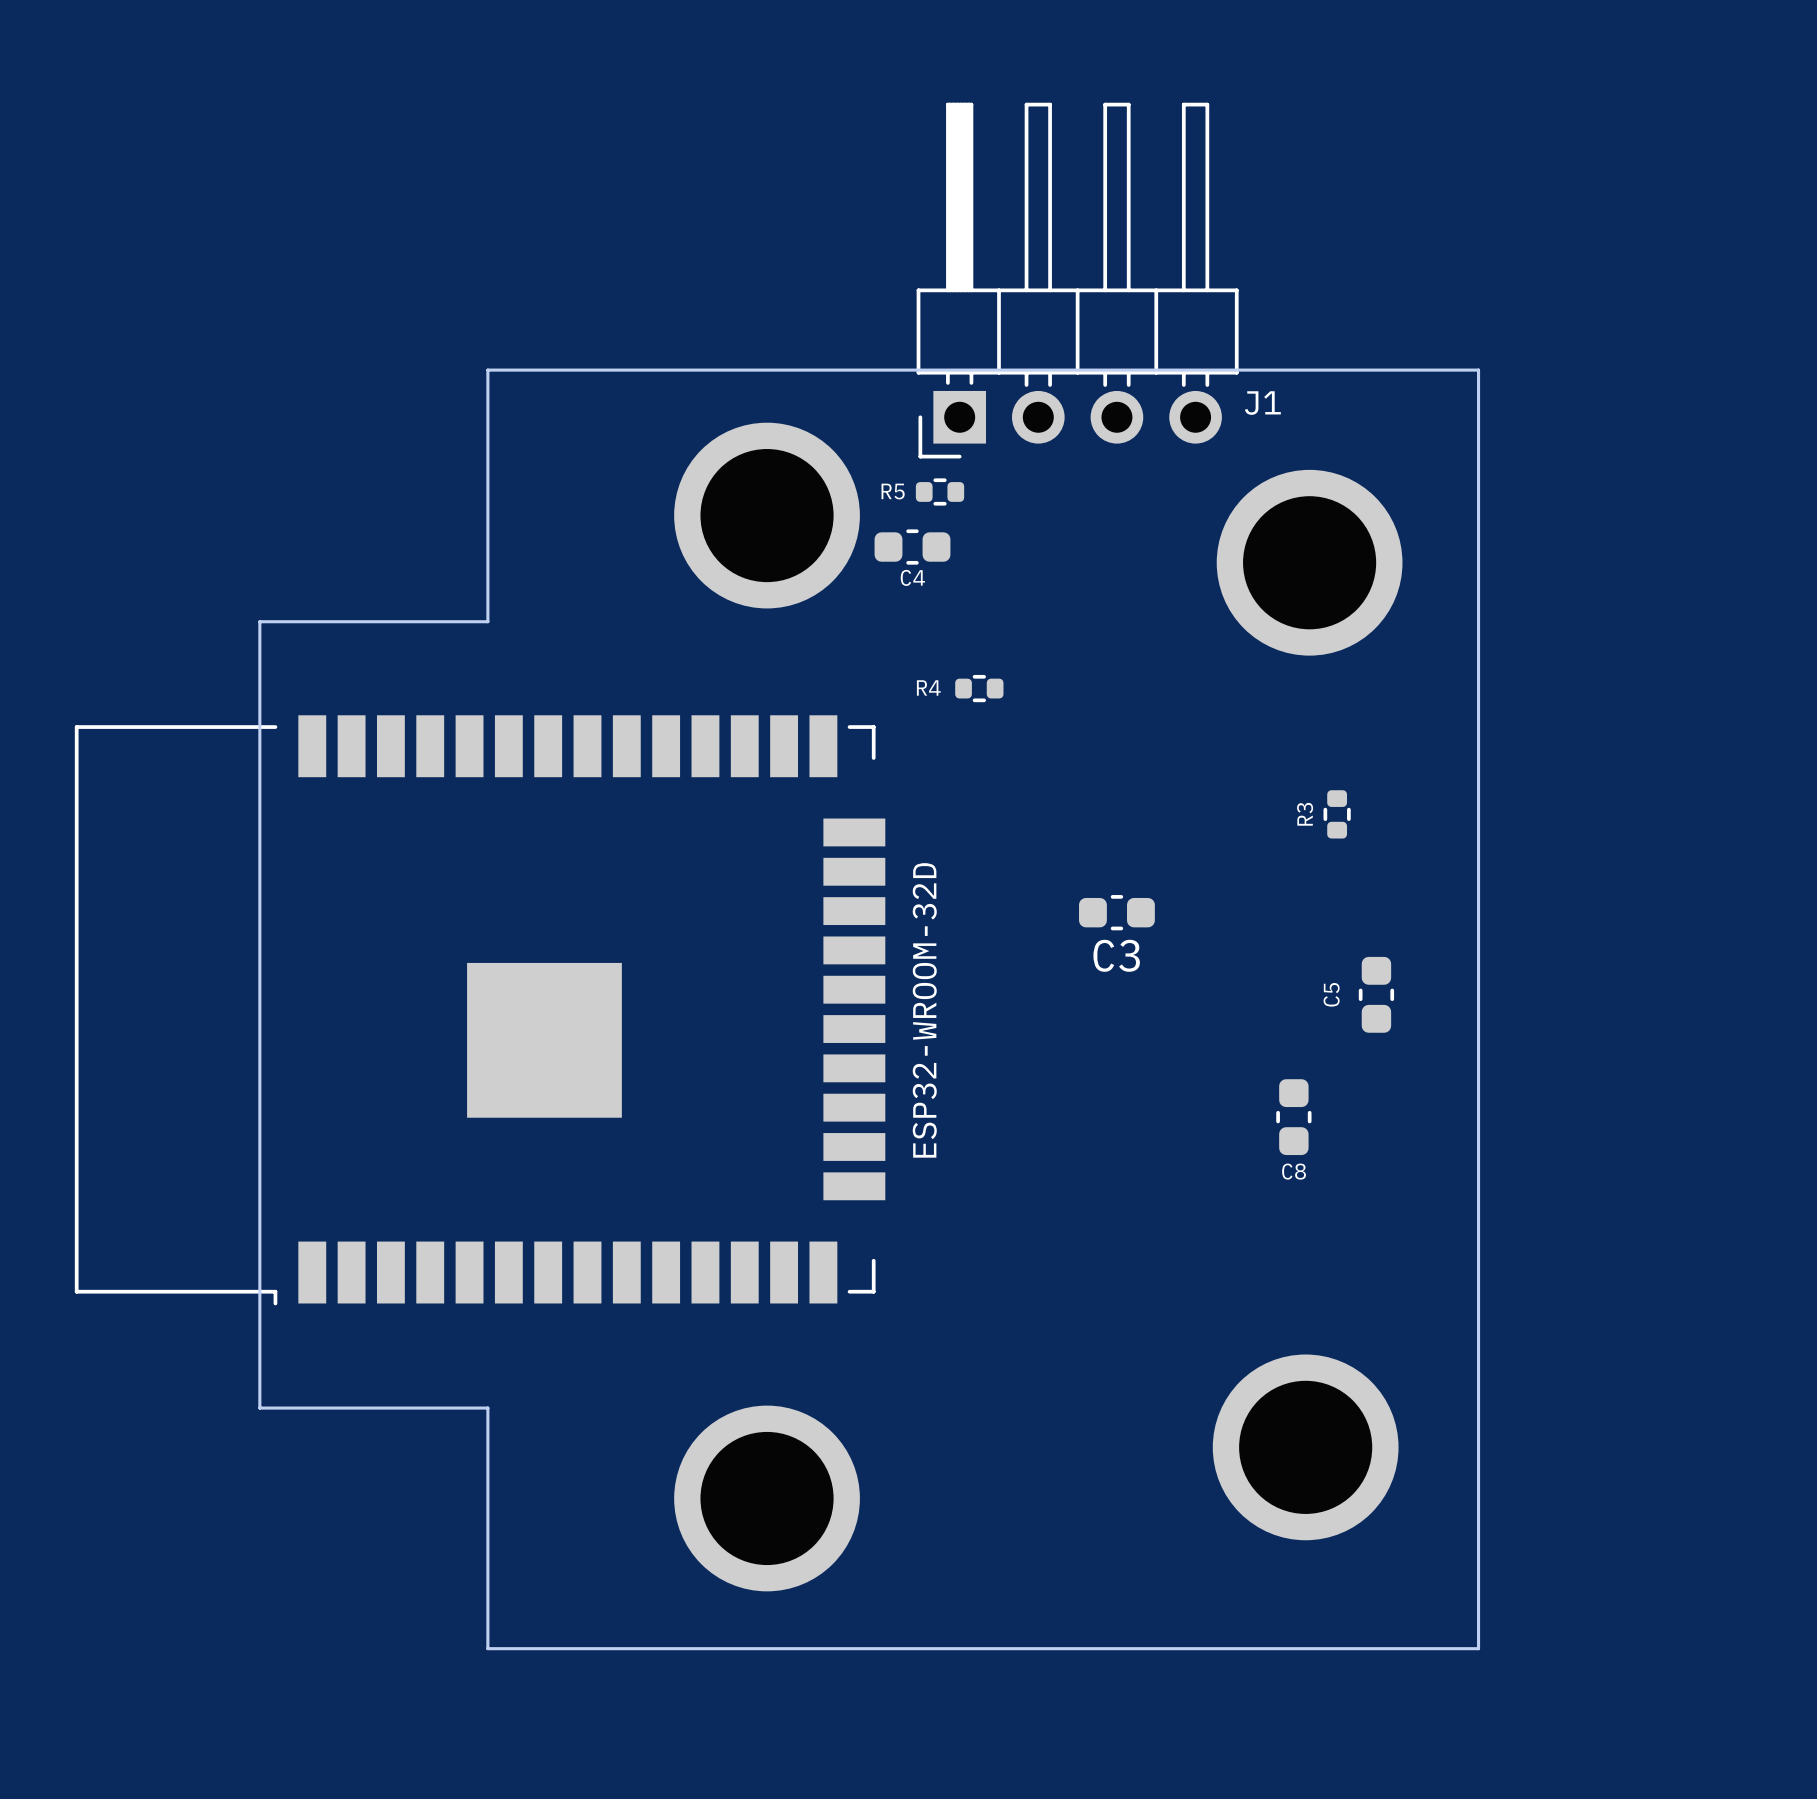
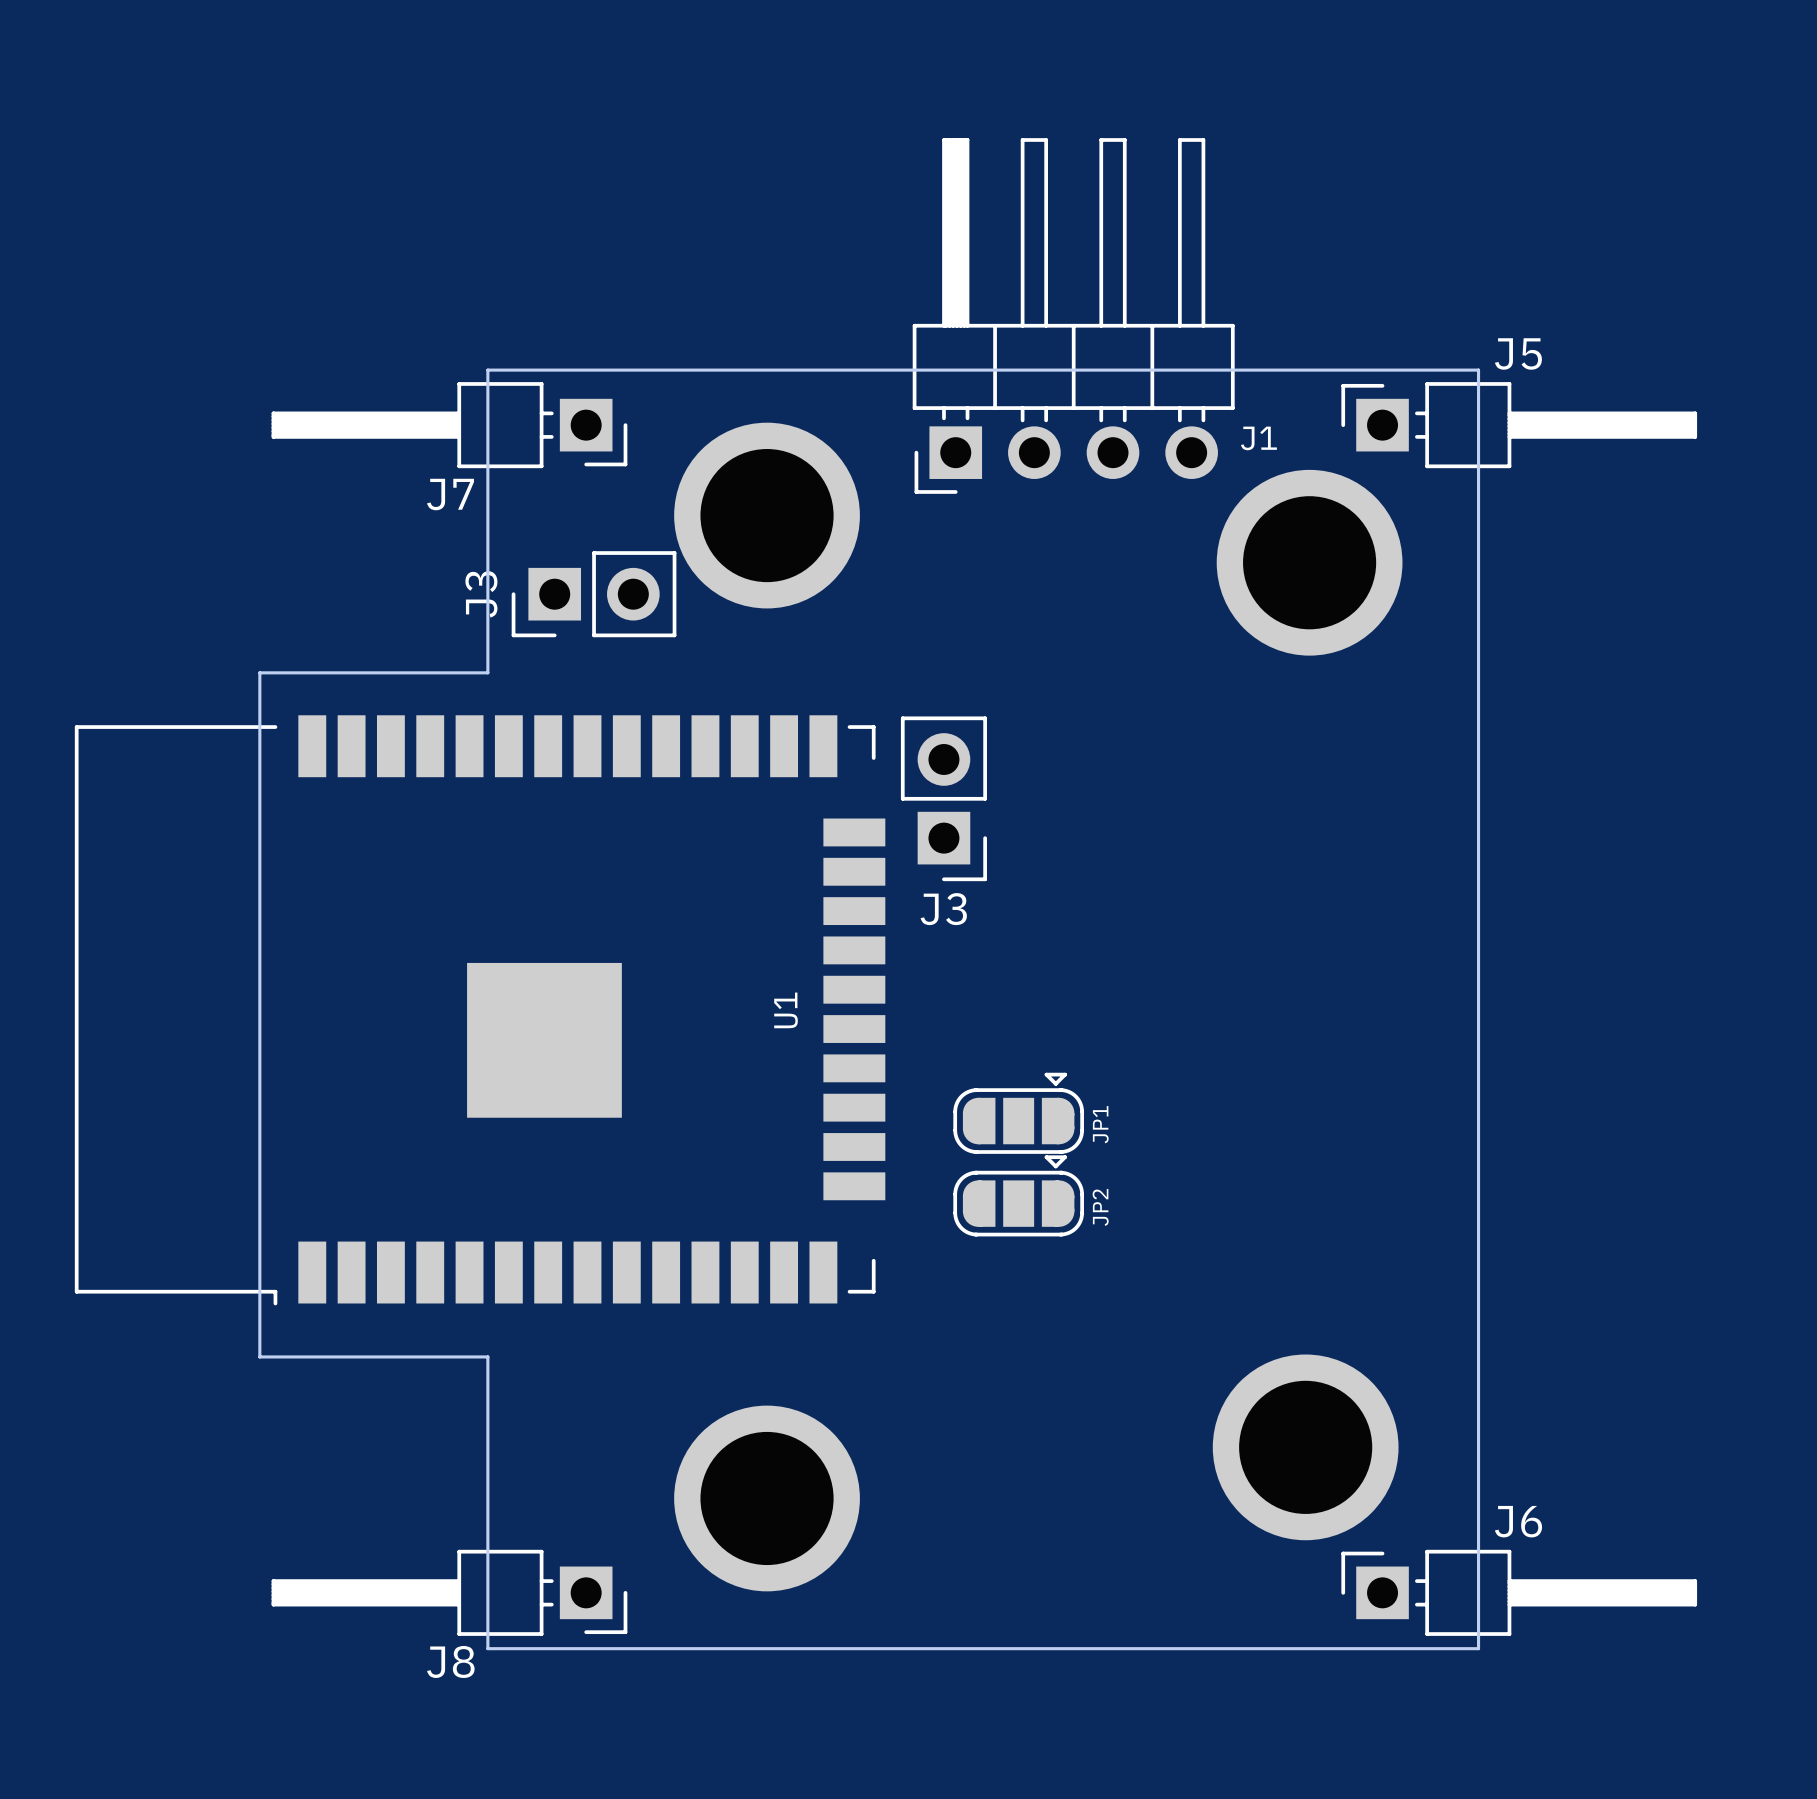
J1 position: (1077, 280) -> (1073, 315)
J7: none -> (449, 425)
J5: none -> (1519, 425)
R5: (940, 491) -> none
C4: (912, 547) -> none
J3: none -> (594, 594)
board edge: (487, 621) (259, 621) (259, 672) -> (487, 621) (487, 672) (259, 672)
R4: (979, 688) -> none
J3: none -> (943, 798)
R3: (1337, 814) -> none
C3: (1116, 912) -> none
C5: (1376, 994) -> none
ESP32-WROOM-32D name: ESP32-WROOM-32D (924, 1010) -> U1 (786, 1010)
JP1: none -> (1018, 1113)
C8: (1293, 1117) -> none
JP2: none -> (1018, 1195)
board edge: (259, 1356) (259, 1408) (487, 1408) -> (259, 1356) (487, 1356) (487, 1408)
J8: none -> (449, 1592)
J6: none -> (1519, 1592)

